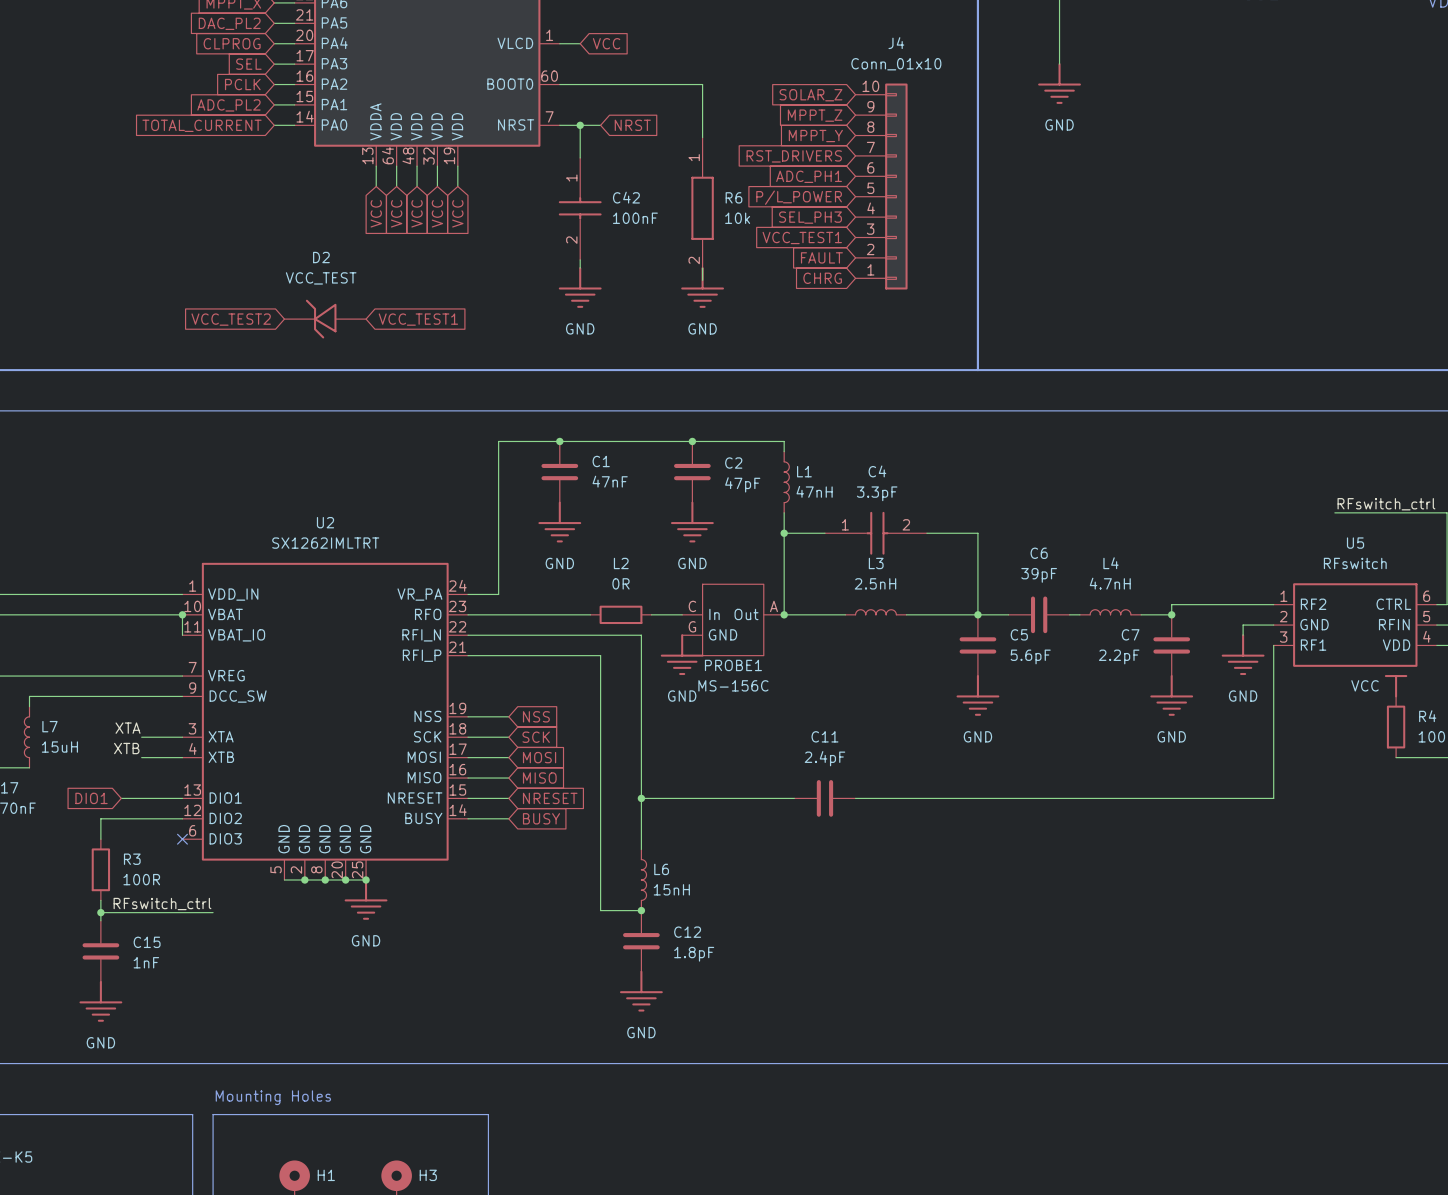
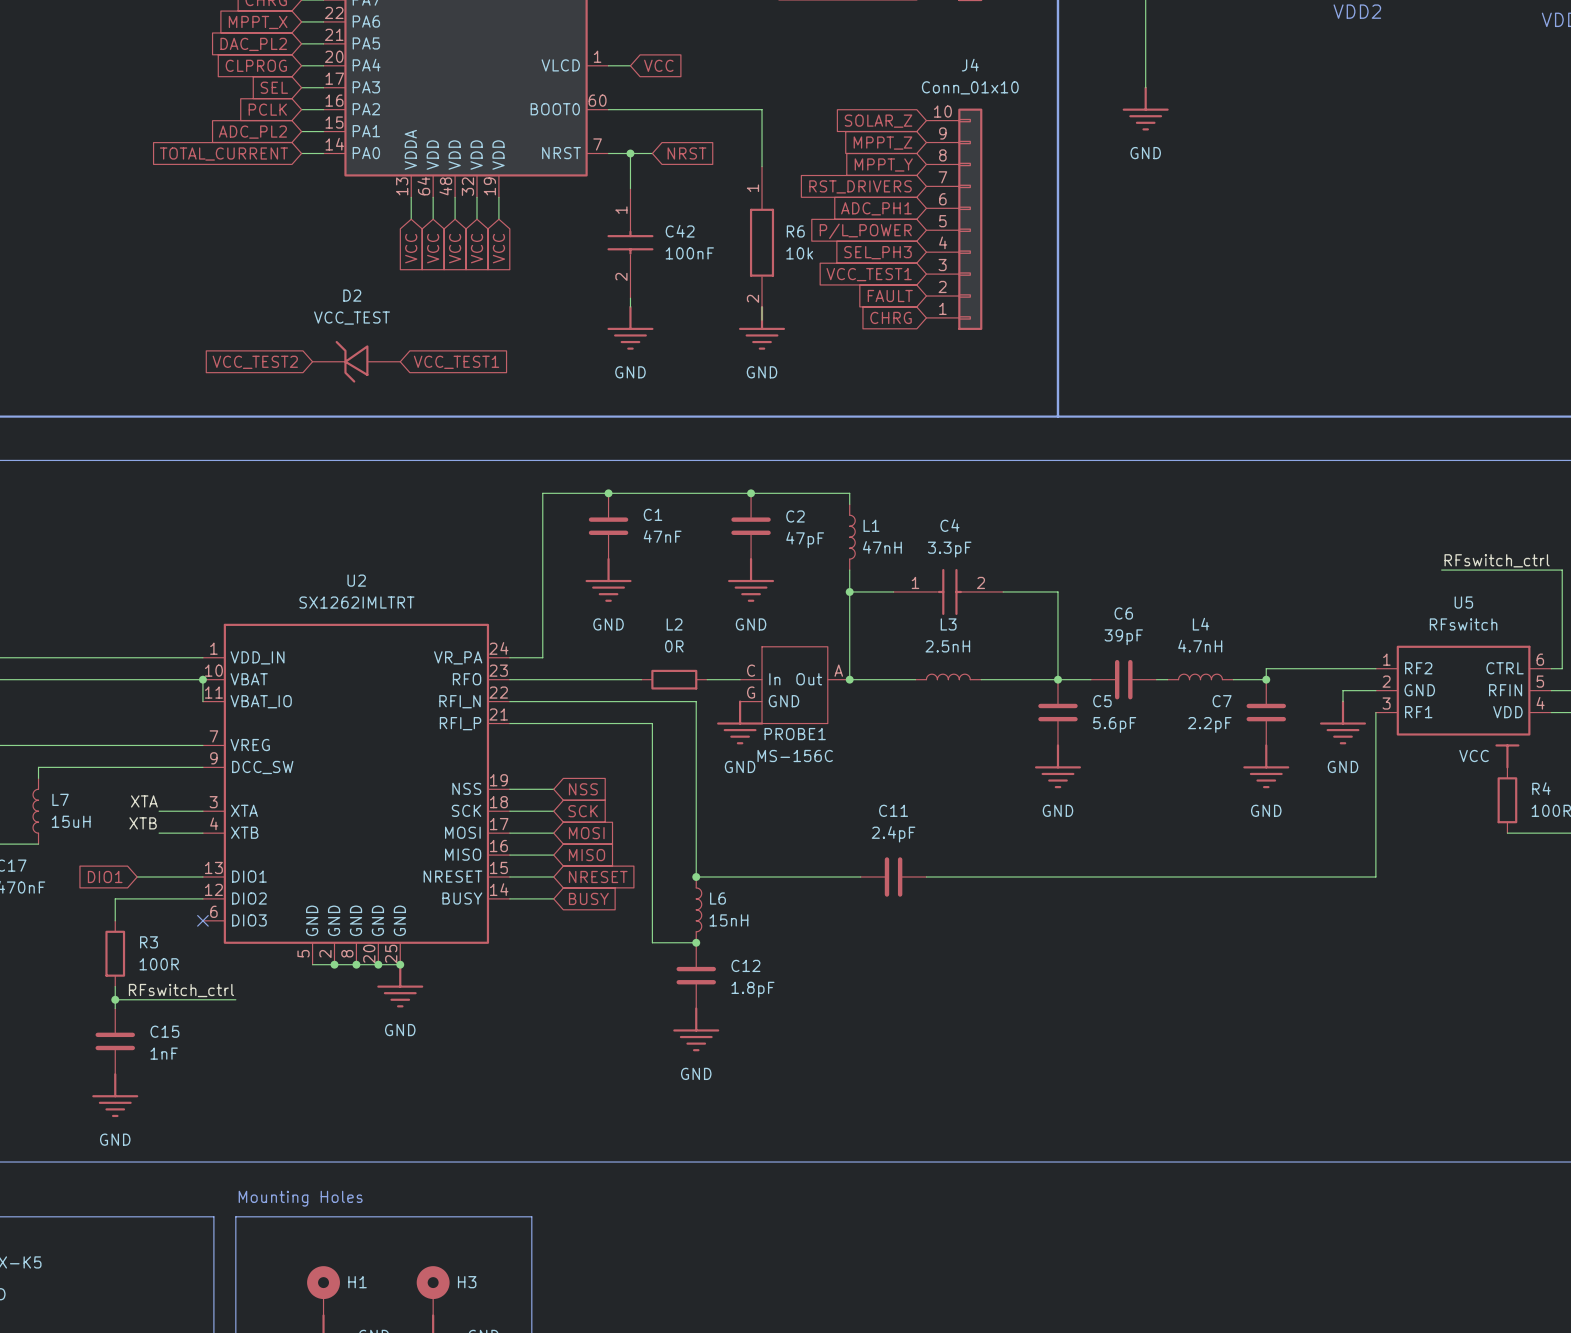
wire: (641, 798) (641, 849) -> none
wire: (600, 859) (600, 910) (641, 910) -> (652, 942) (696, 942)
junction: none -> (696, 942)
L6 position: (643, 880) -> (698, 909)
junction: (641, 910) -> none
C12 position: (641, 941) -> (696, 975)
power symbol position: GND (641, 991) -> GND (696, 1029)

